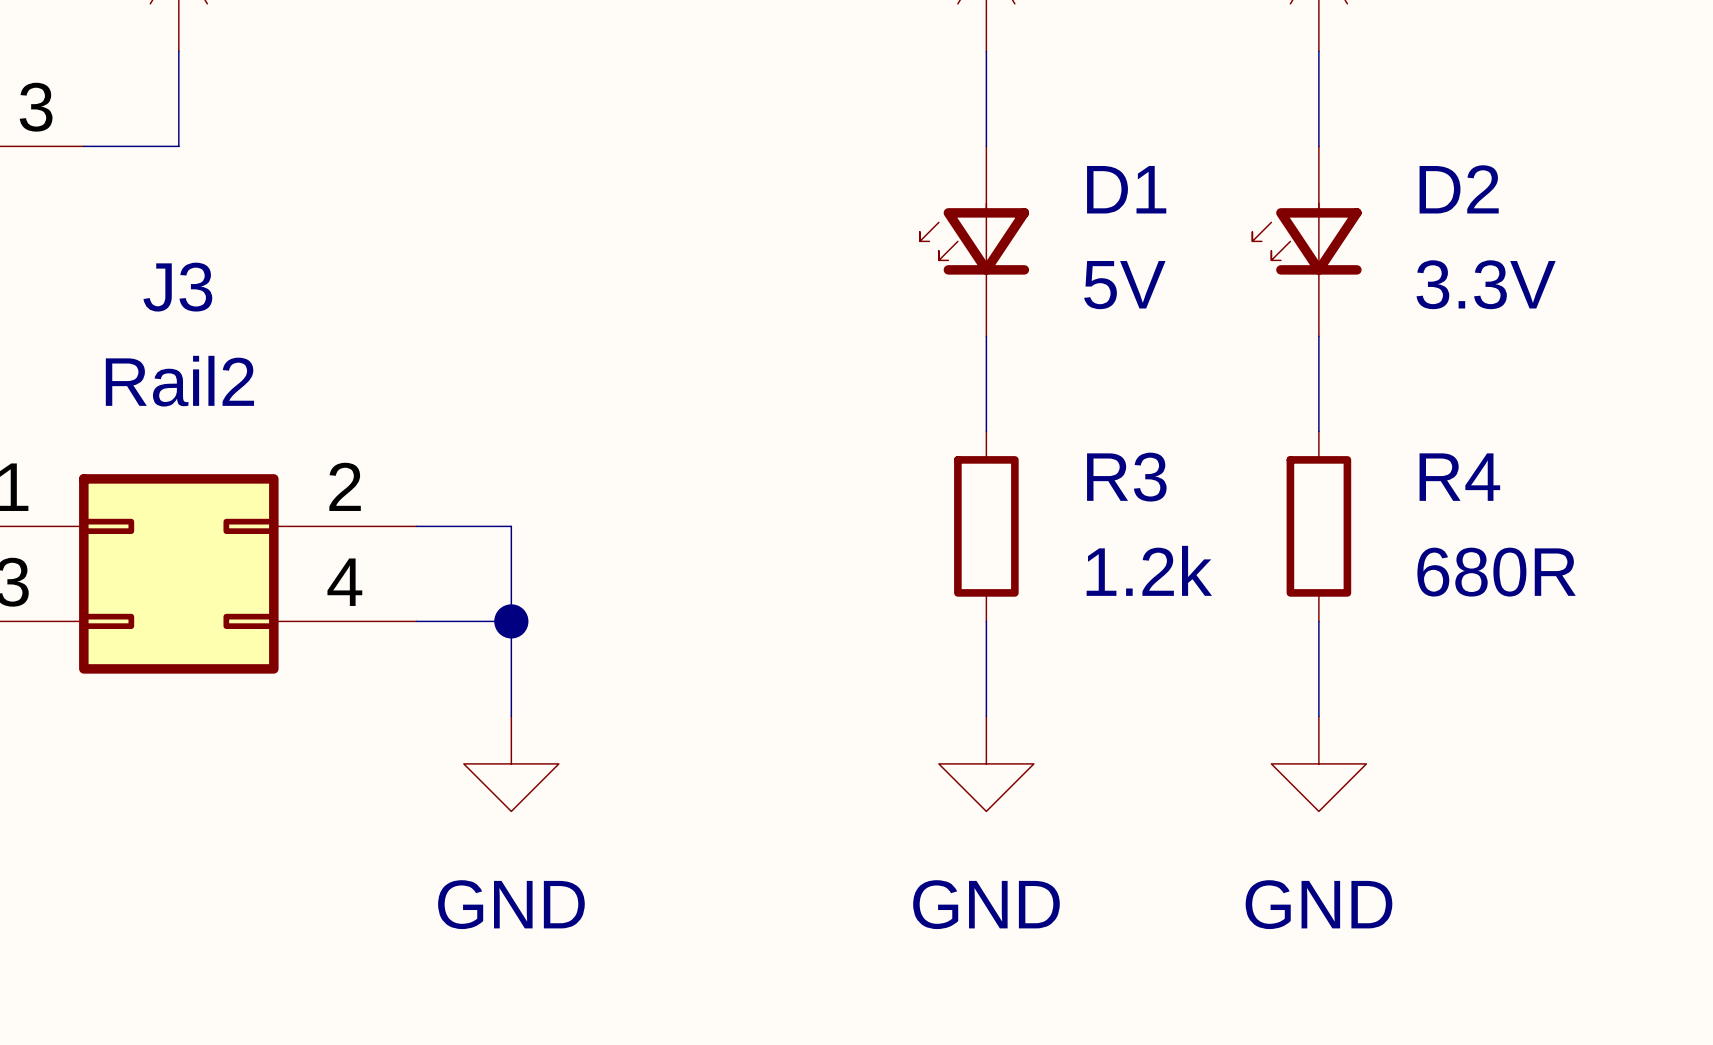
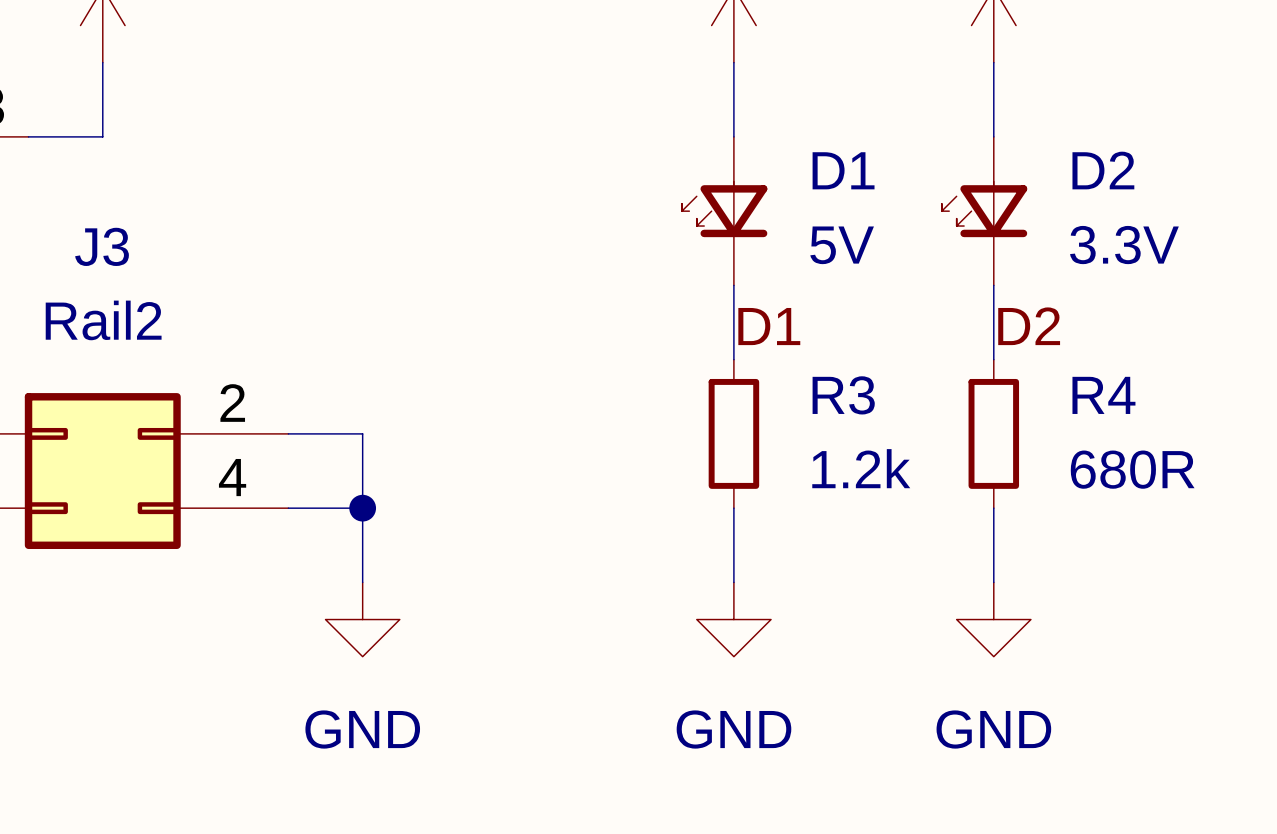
label: none -> D2 (1029, 326)
label: none -> D1 (769, 326)

